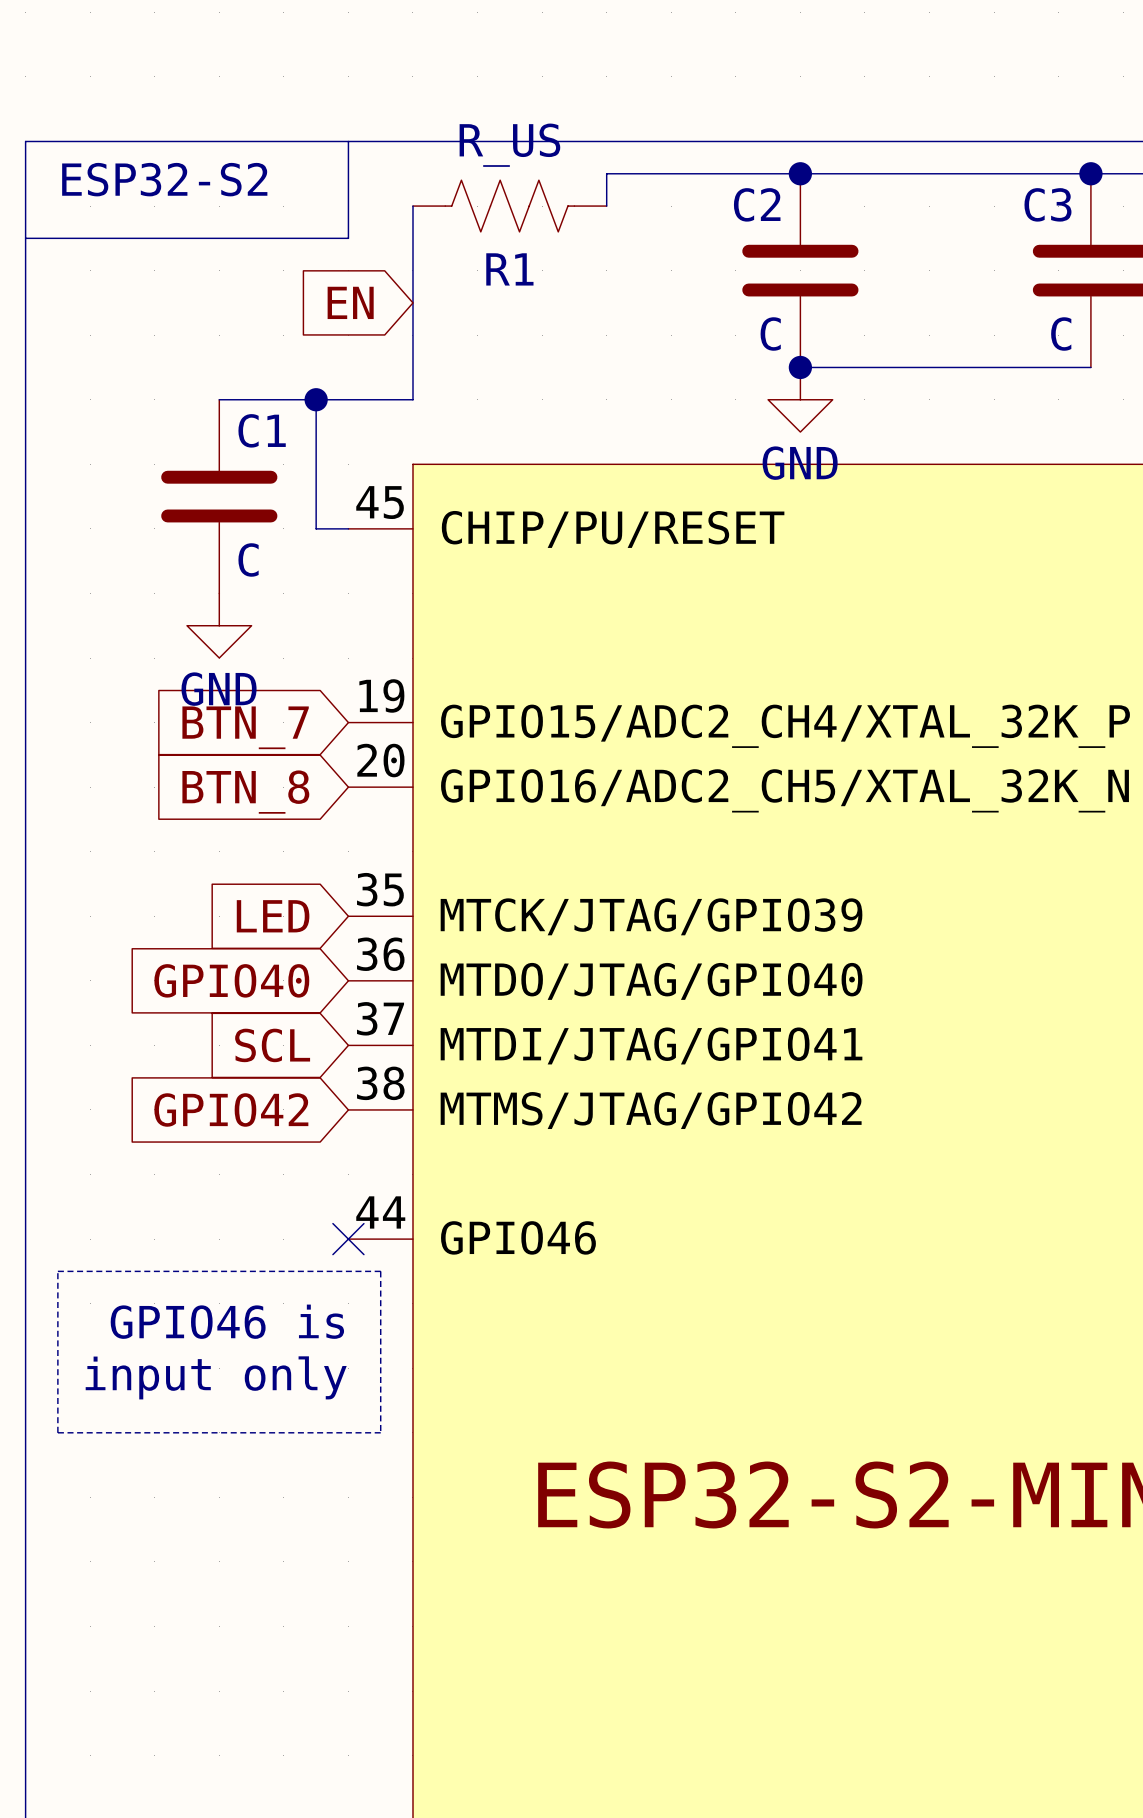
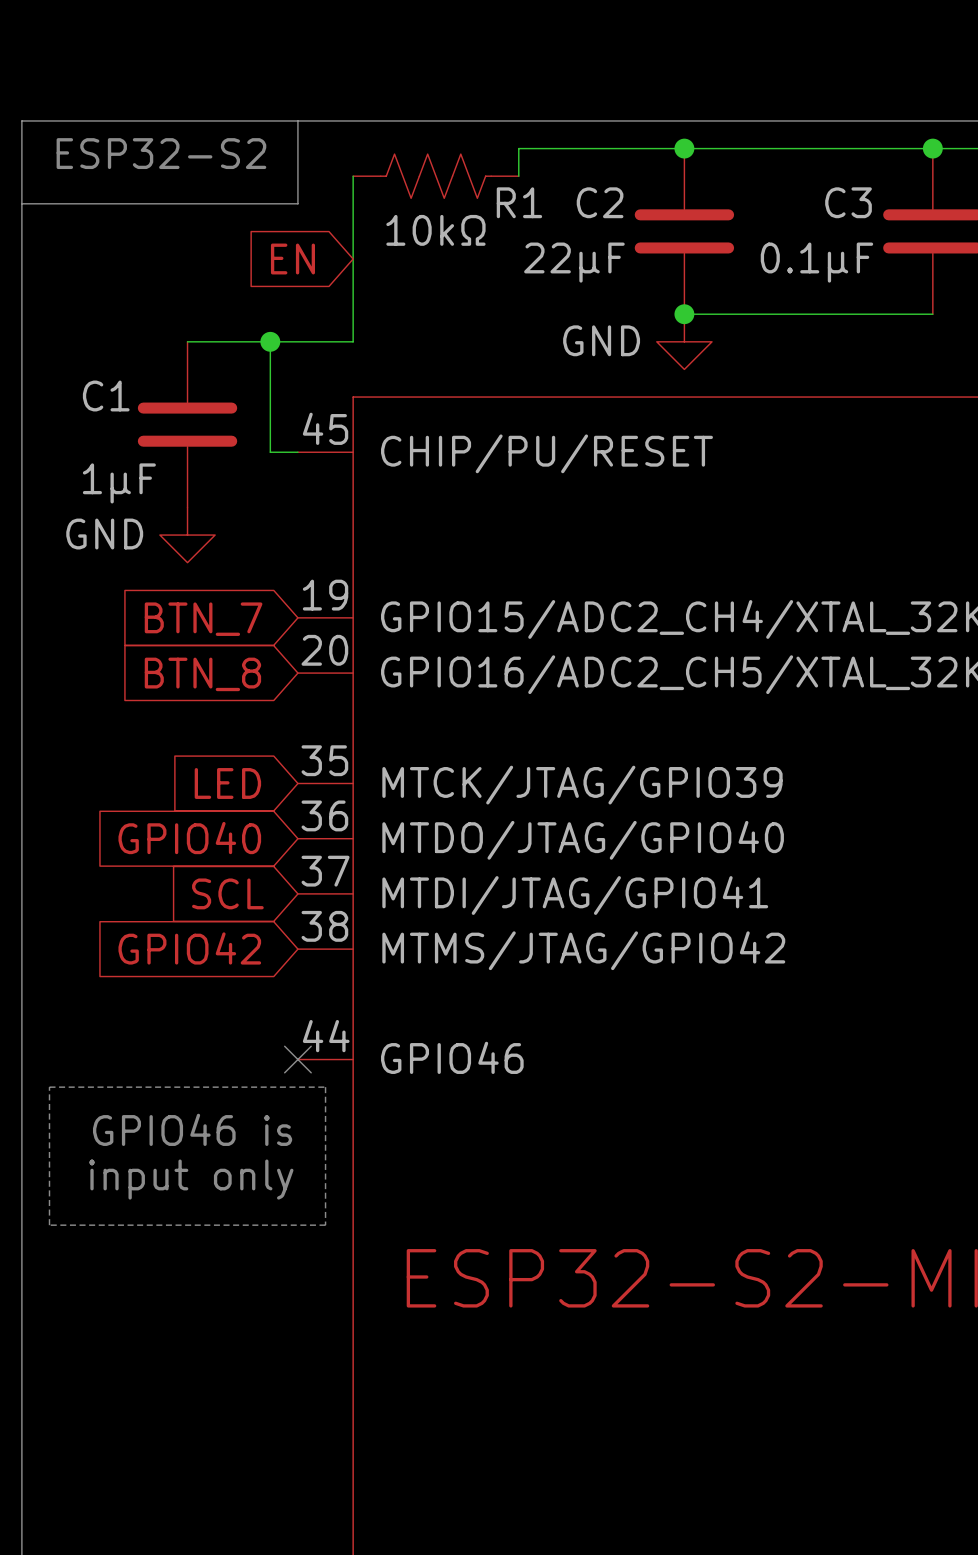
R1 value: R_US (509, 145) -> 10kΩ (435, 230)
C2 name position: C2 (757, 204) -> C2 (600, 202)
C3 name position: C3 (1047, 204) -> C3 (848, 202)
R1 name position: R1 (509, 269) -> R1 (519, 202)
C2 value: C (770, 334) -> 22μF (574, 262)
C3 value: C (1061, 334) -> 0.1μF (816, 262)
C1 name position: C1 (262, 430) -> C1 (106, 396)
power symbol text position: GND (800, 463) -> GND (601, 340)
C1 value: C (248, 559) -> 1μF (119, 483)
power symbol text position: GND (219, 689) -> GND (104, 534)

